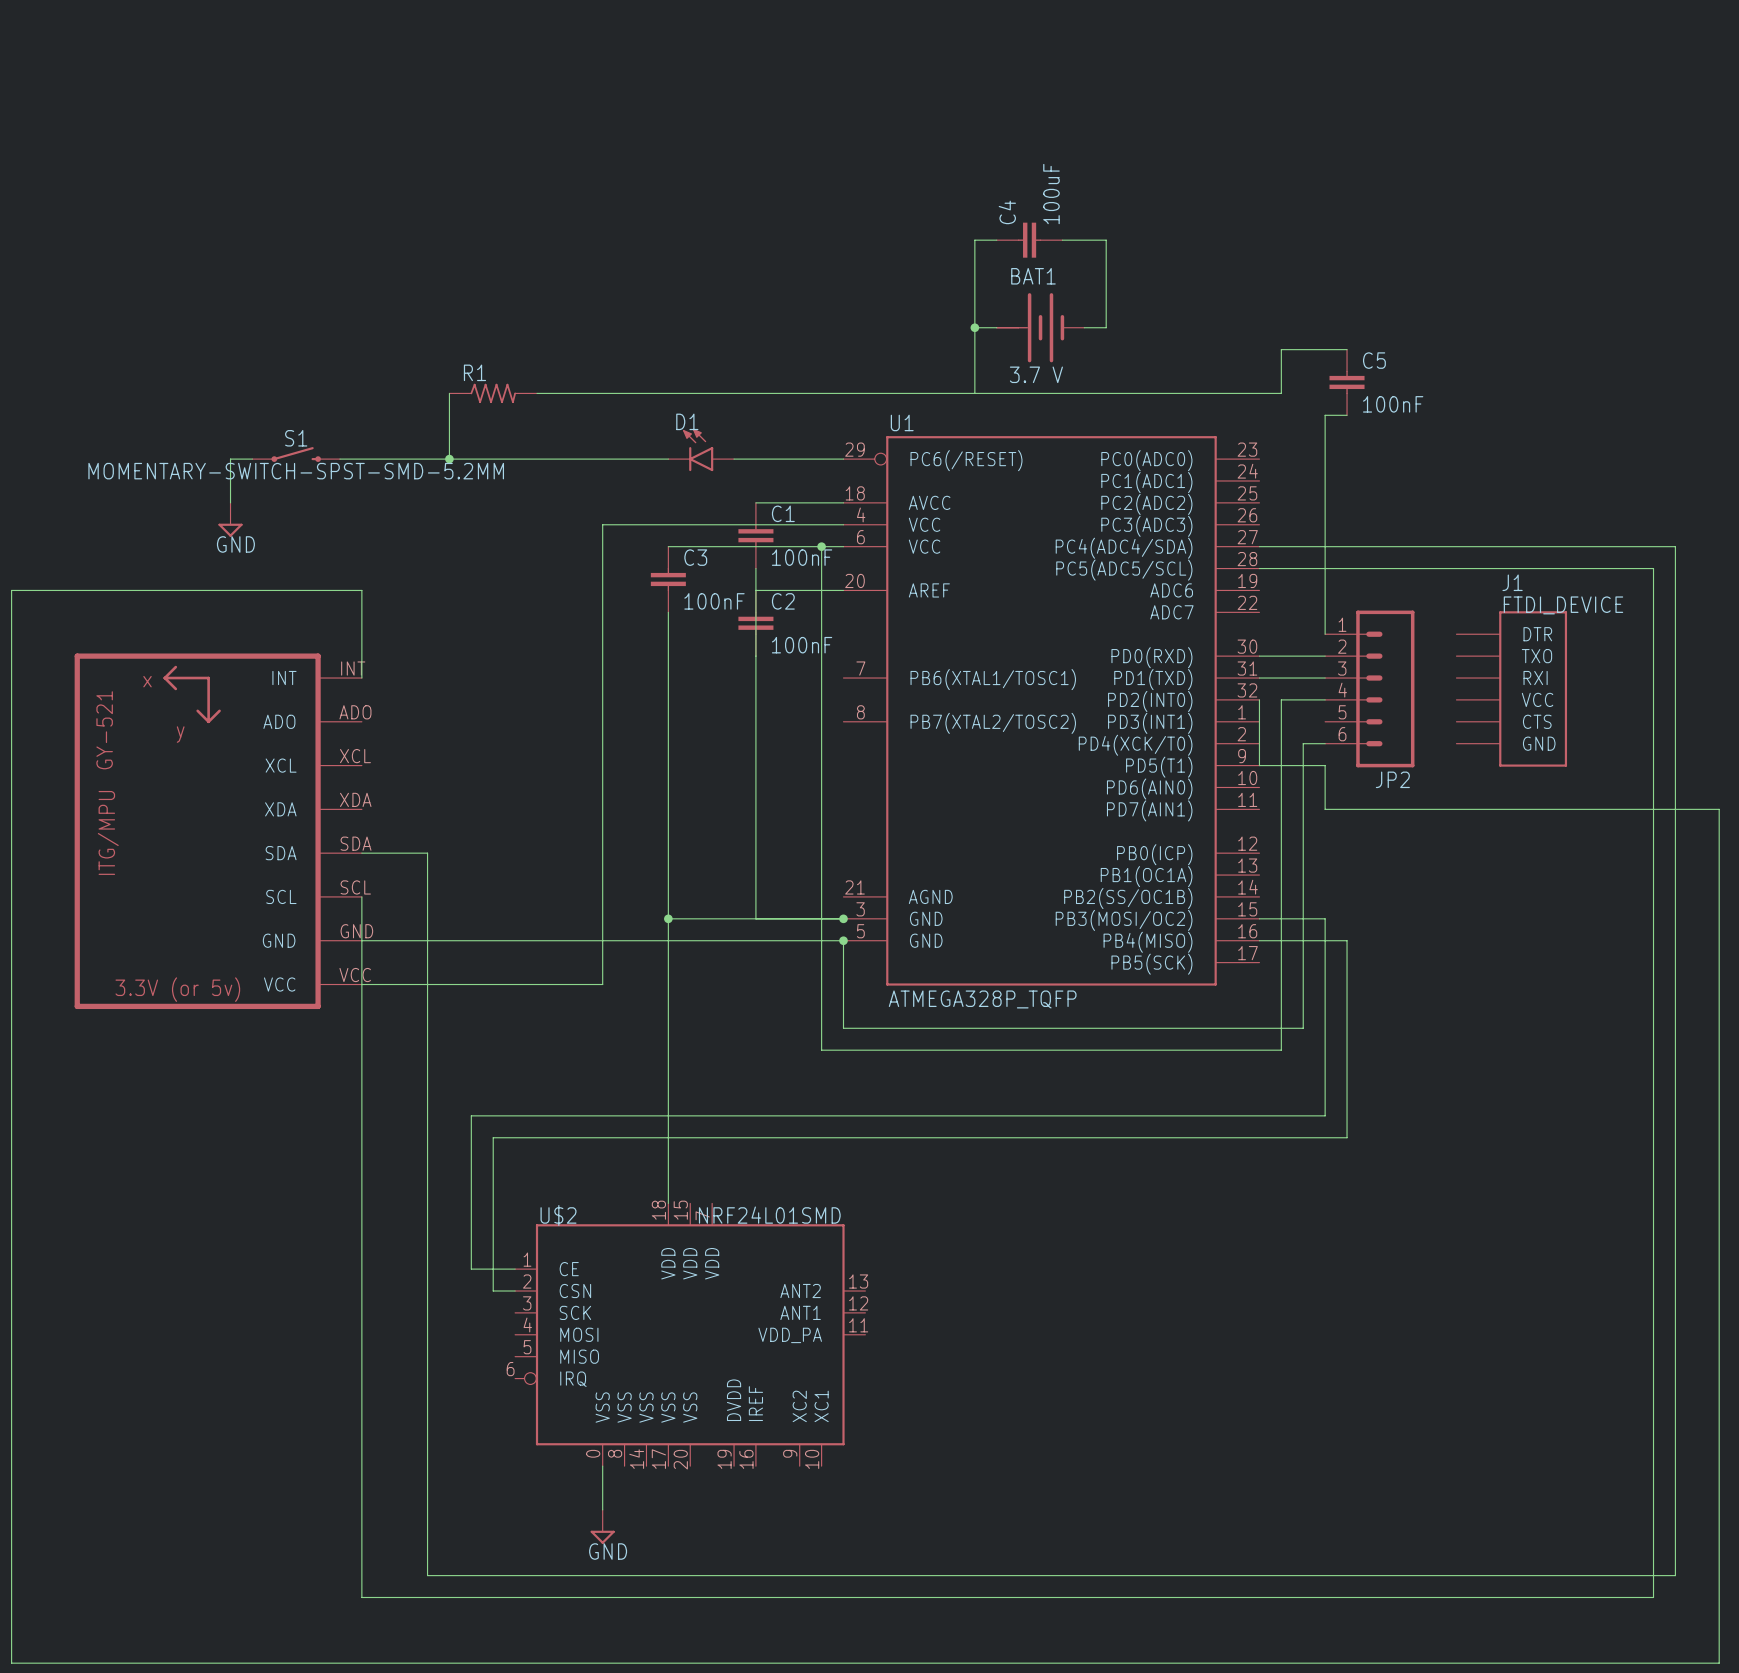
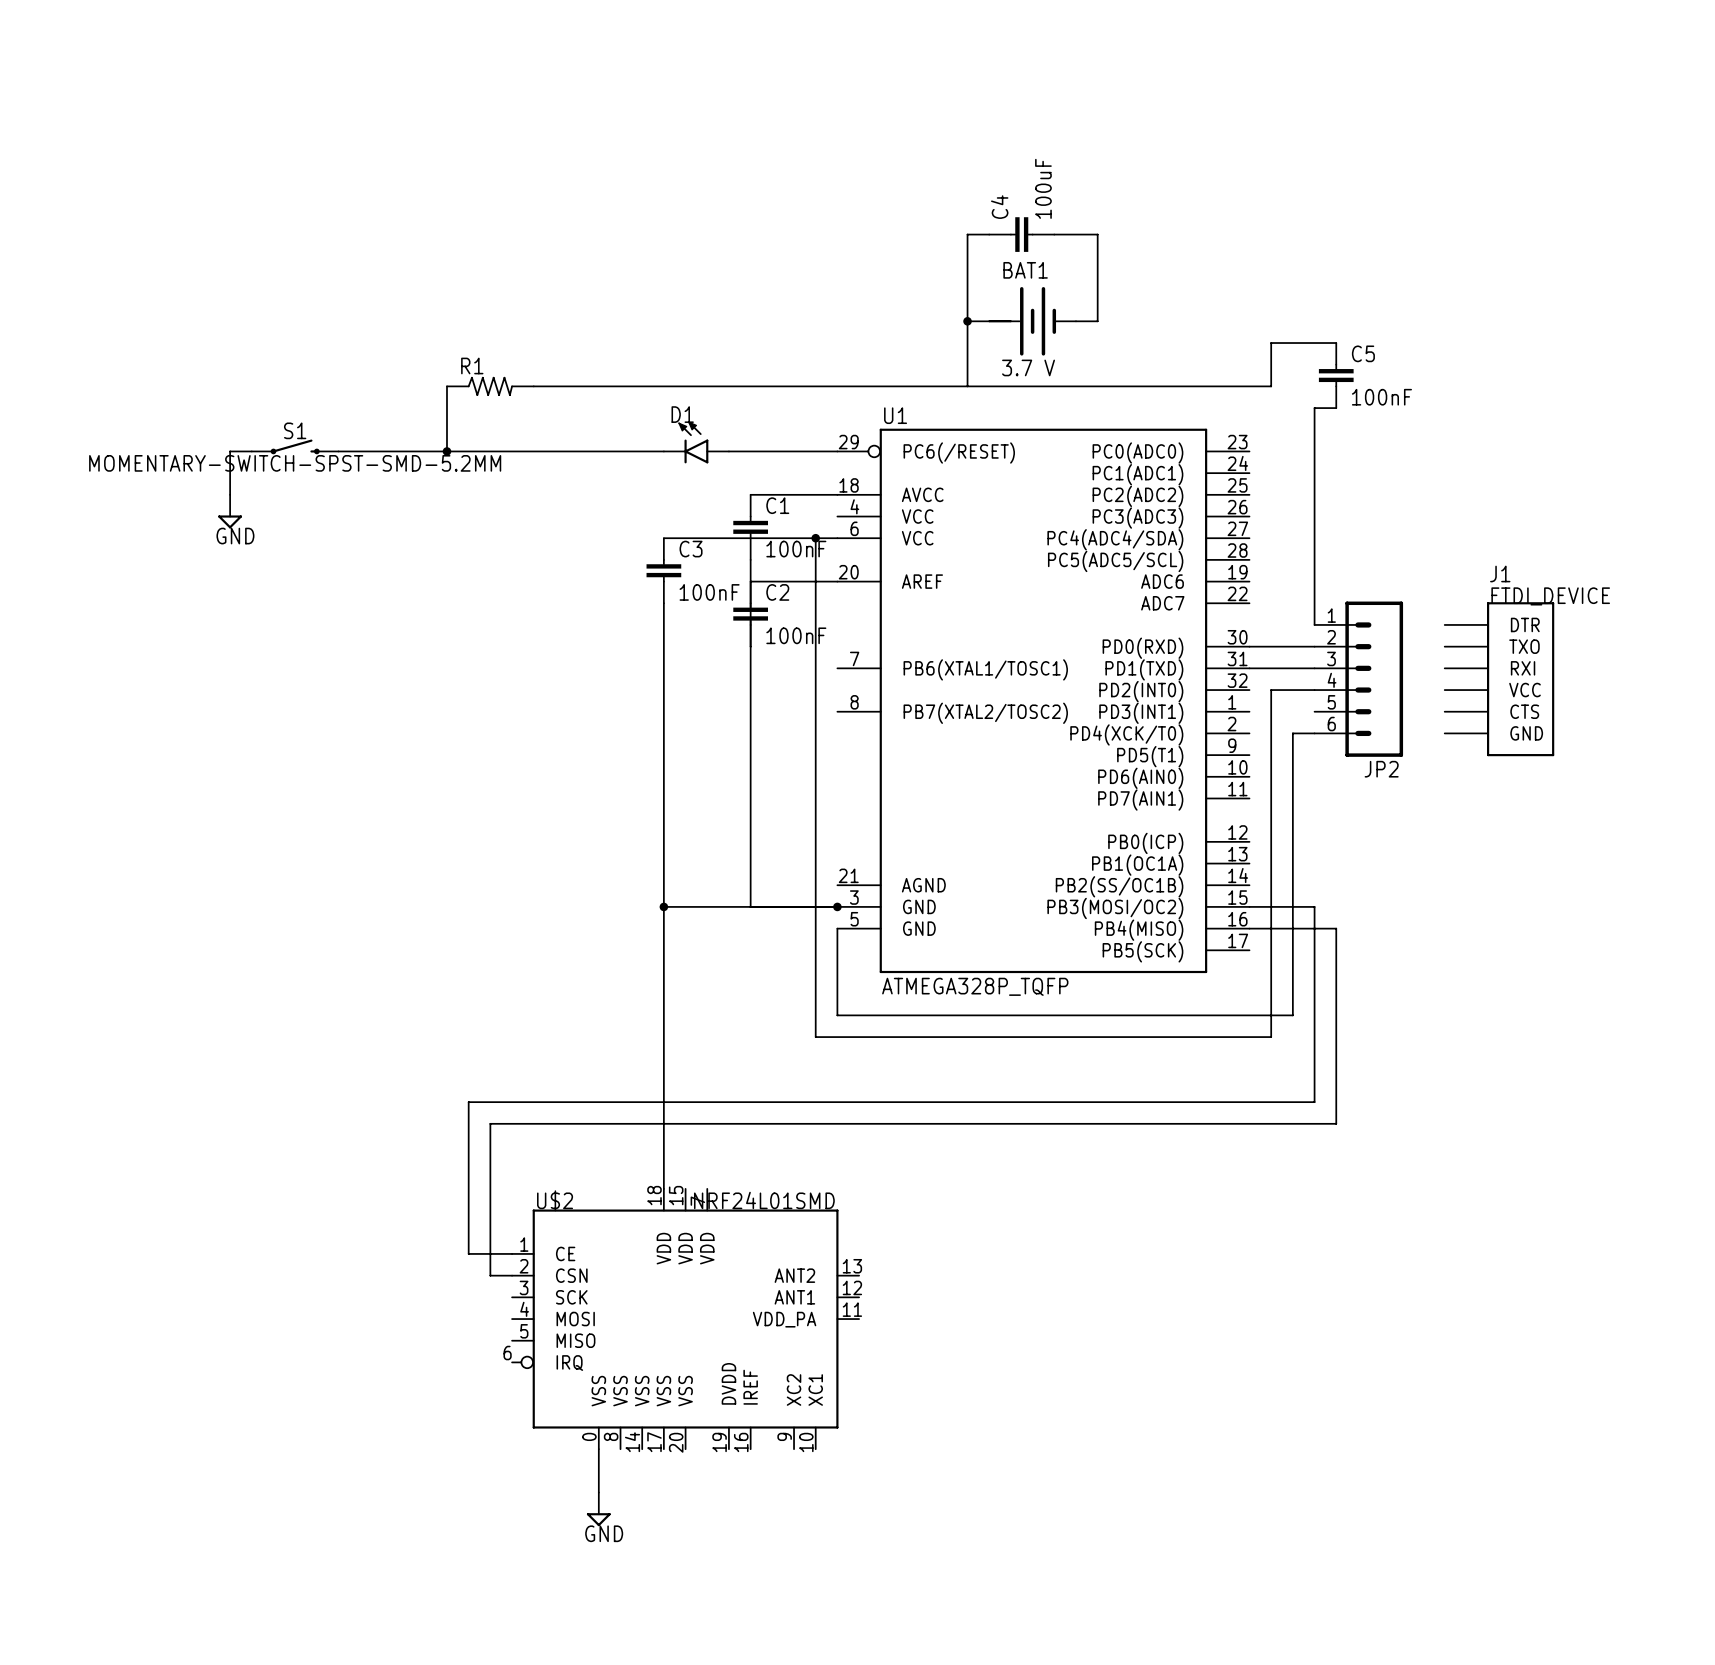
wire: (843, 524) (602, 524) (602, 984) (361, 984) -> none
wire: (1259, 546) (1675, 546) (1675, 1575) (427, 1575) (427, 853) (361, 853) -> none
wire: (1259, 568) (1653, 568) (1653, 1597) (361, 1597) (361, 896) -> none
wire: (361, 678) (361, 590) (11, 590) (11, 1663) (1719, 1663) (1719, 809) (1325, 809) (1325, 765) (1259, 765) (1259, 699) -> none
part: (218, 831) -> none
wire: (361, 940) (843, 940) -> none
junction: (843, 940) -> none

